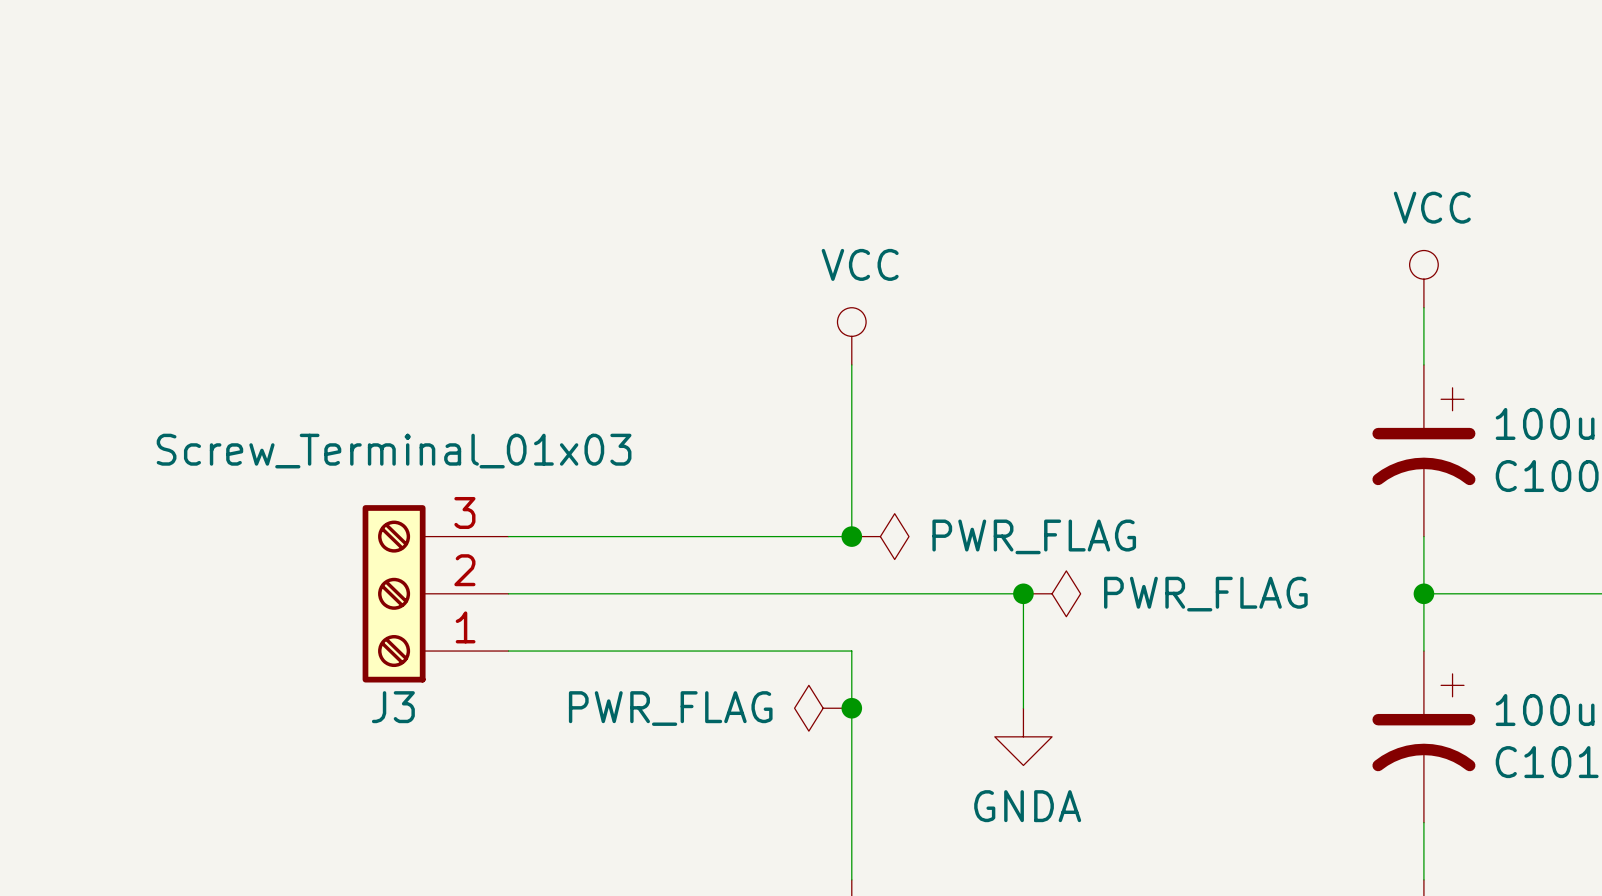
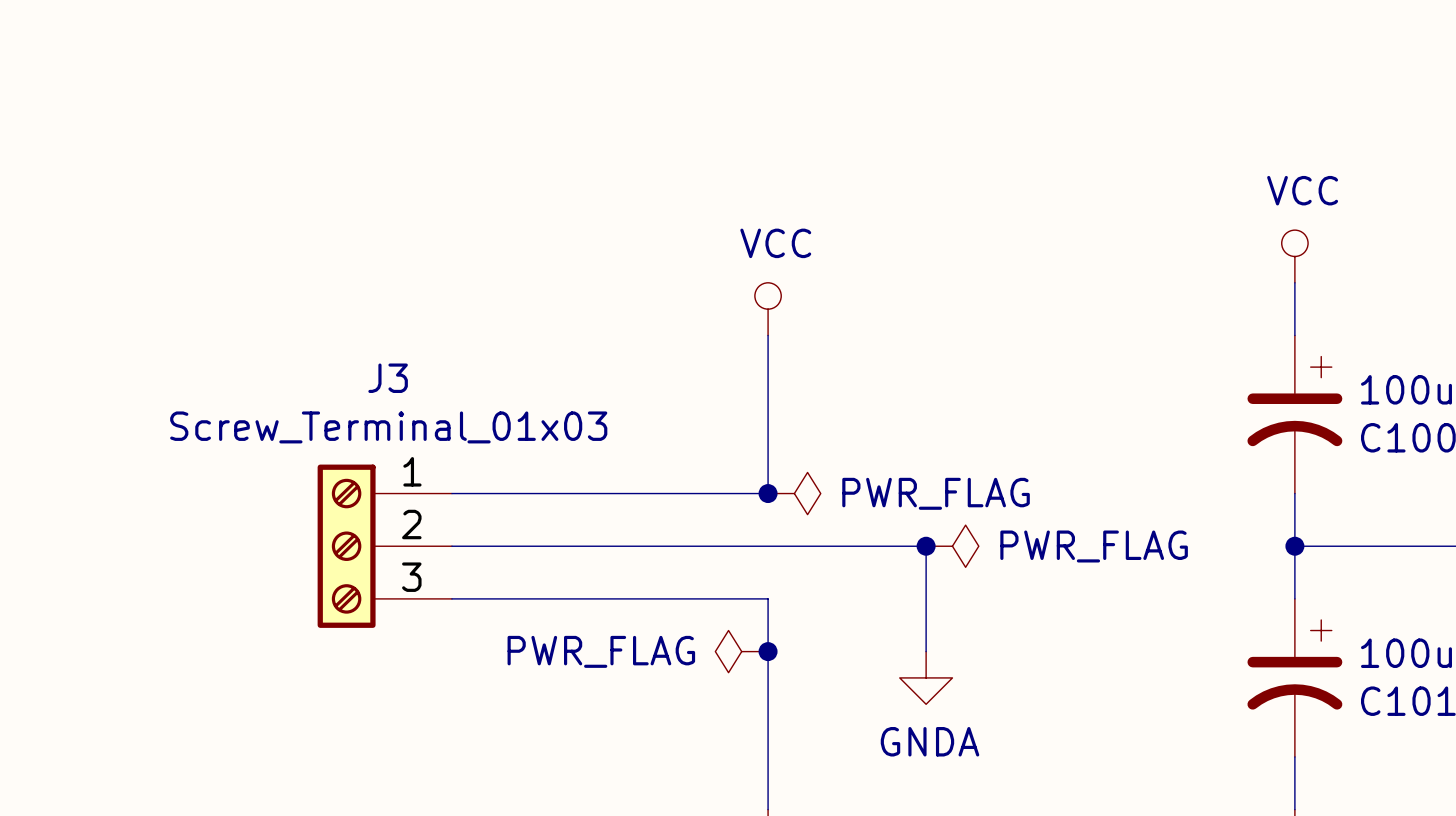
J3 value position: Screw_Terminal_01x03 (394, 451) -> Screw_Terminal_01x03 (388, 427)
J3 flip: as is (394, 593) -> up-down (346, 546)
J3 name position: J3 (393, 707) -> J3 (388, 378)

